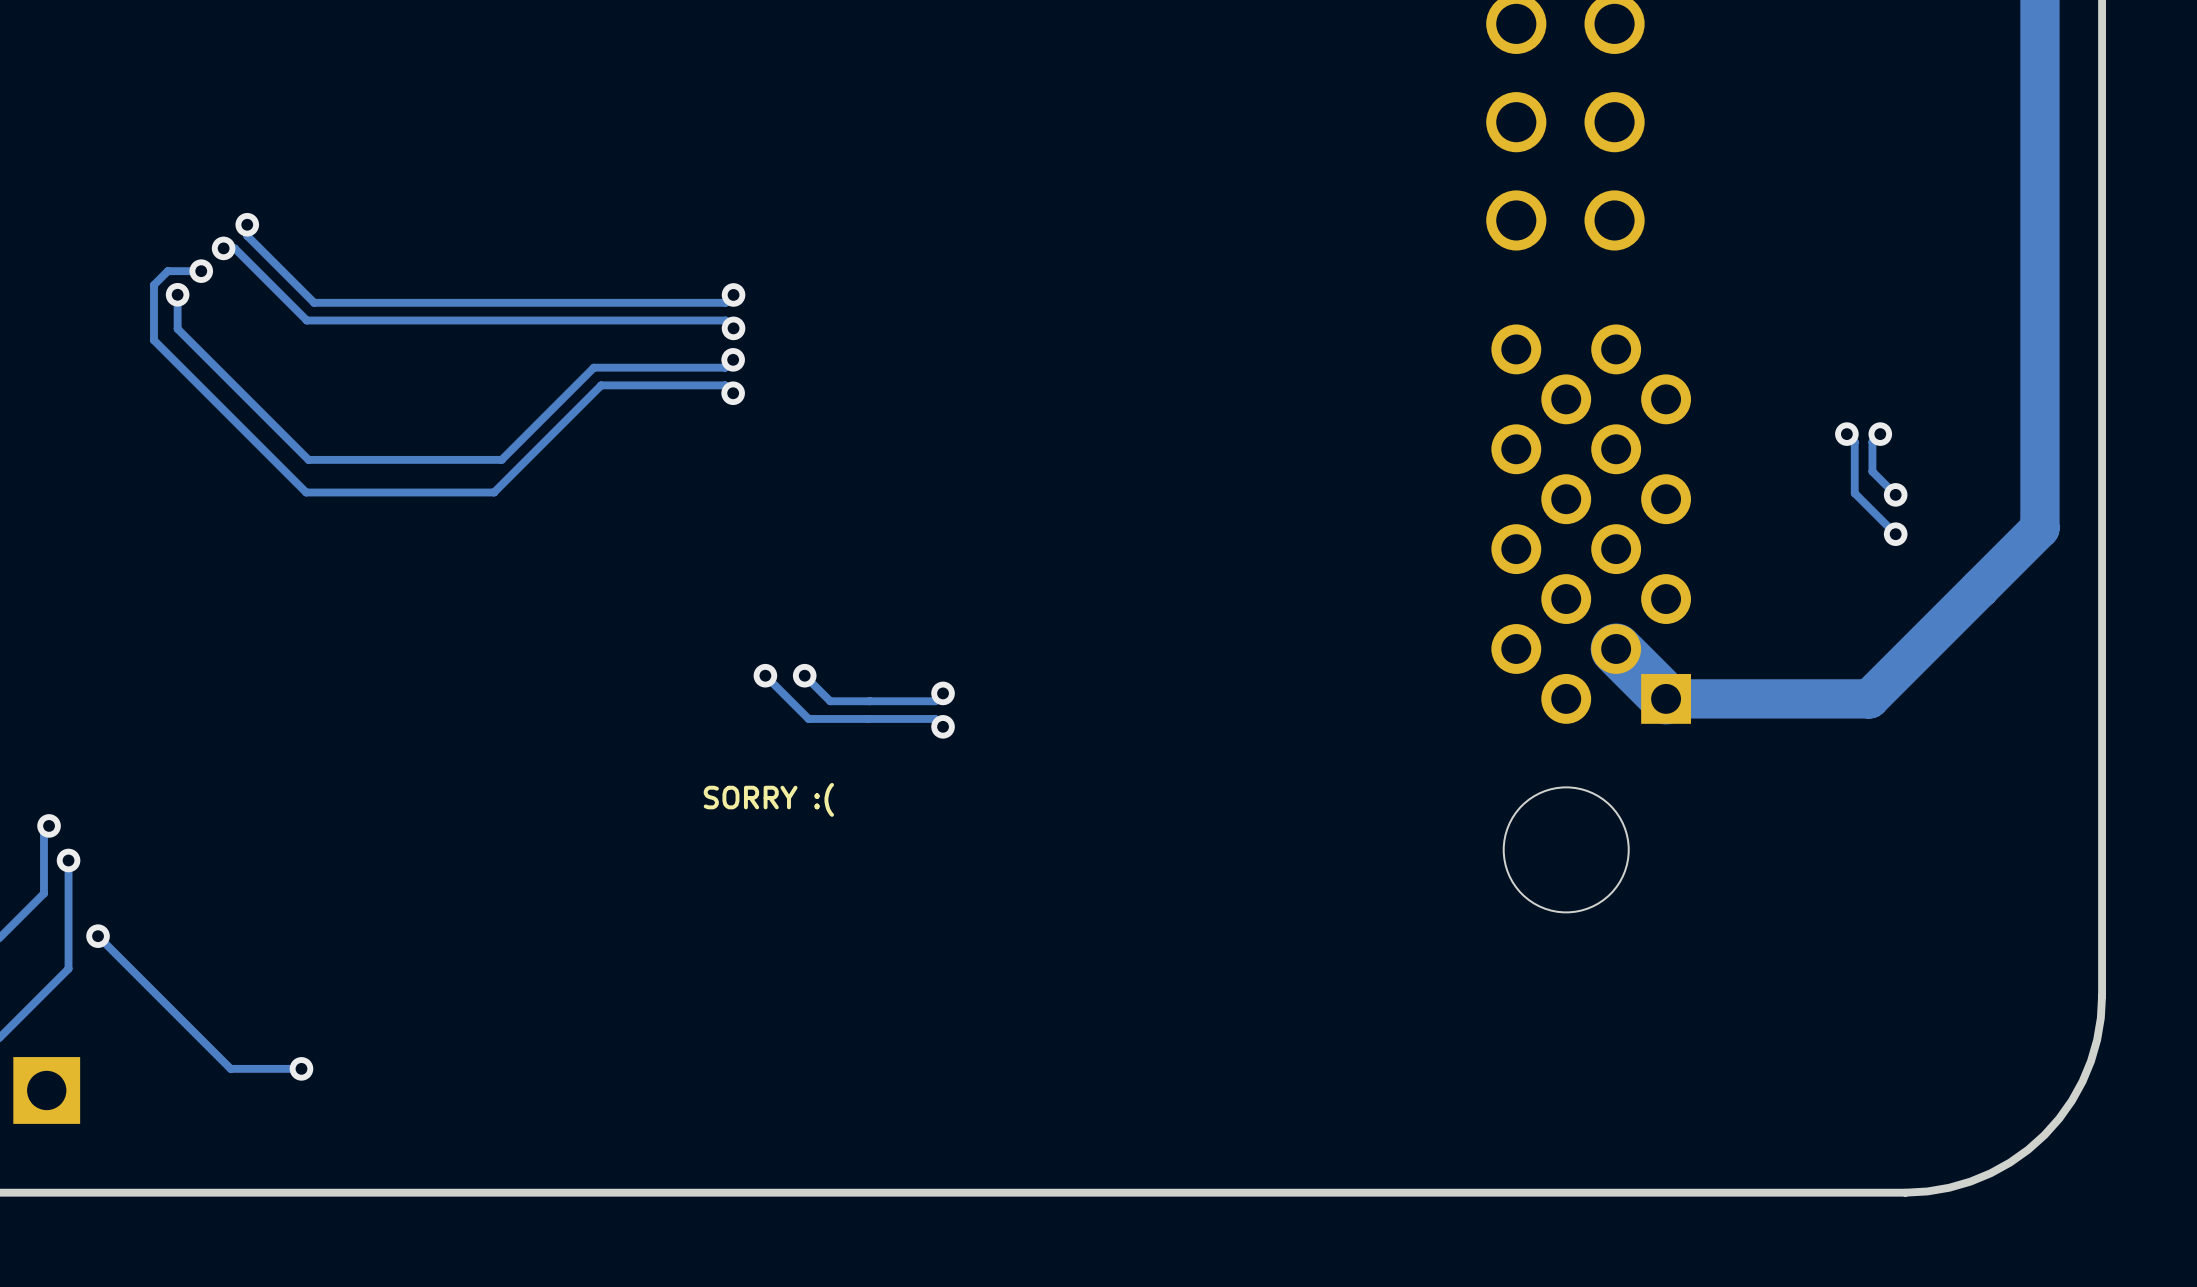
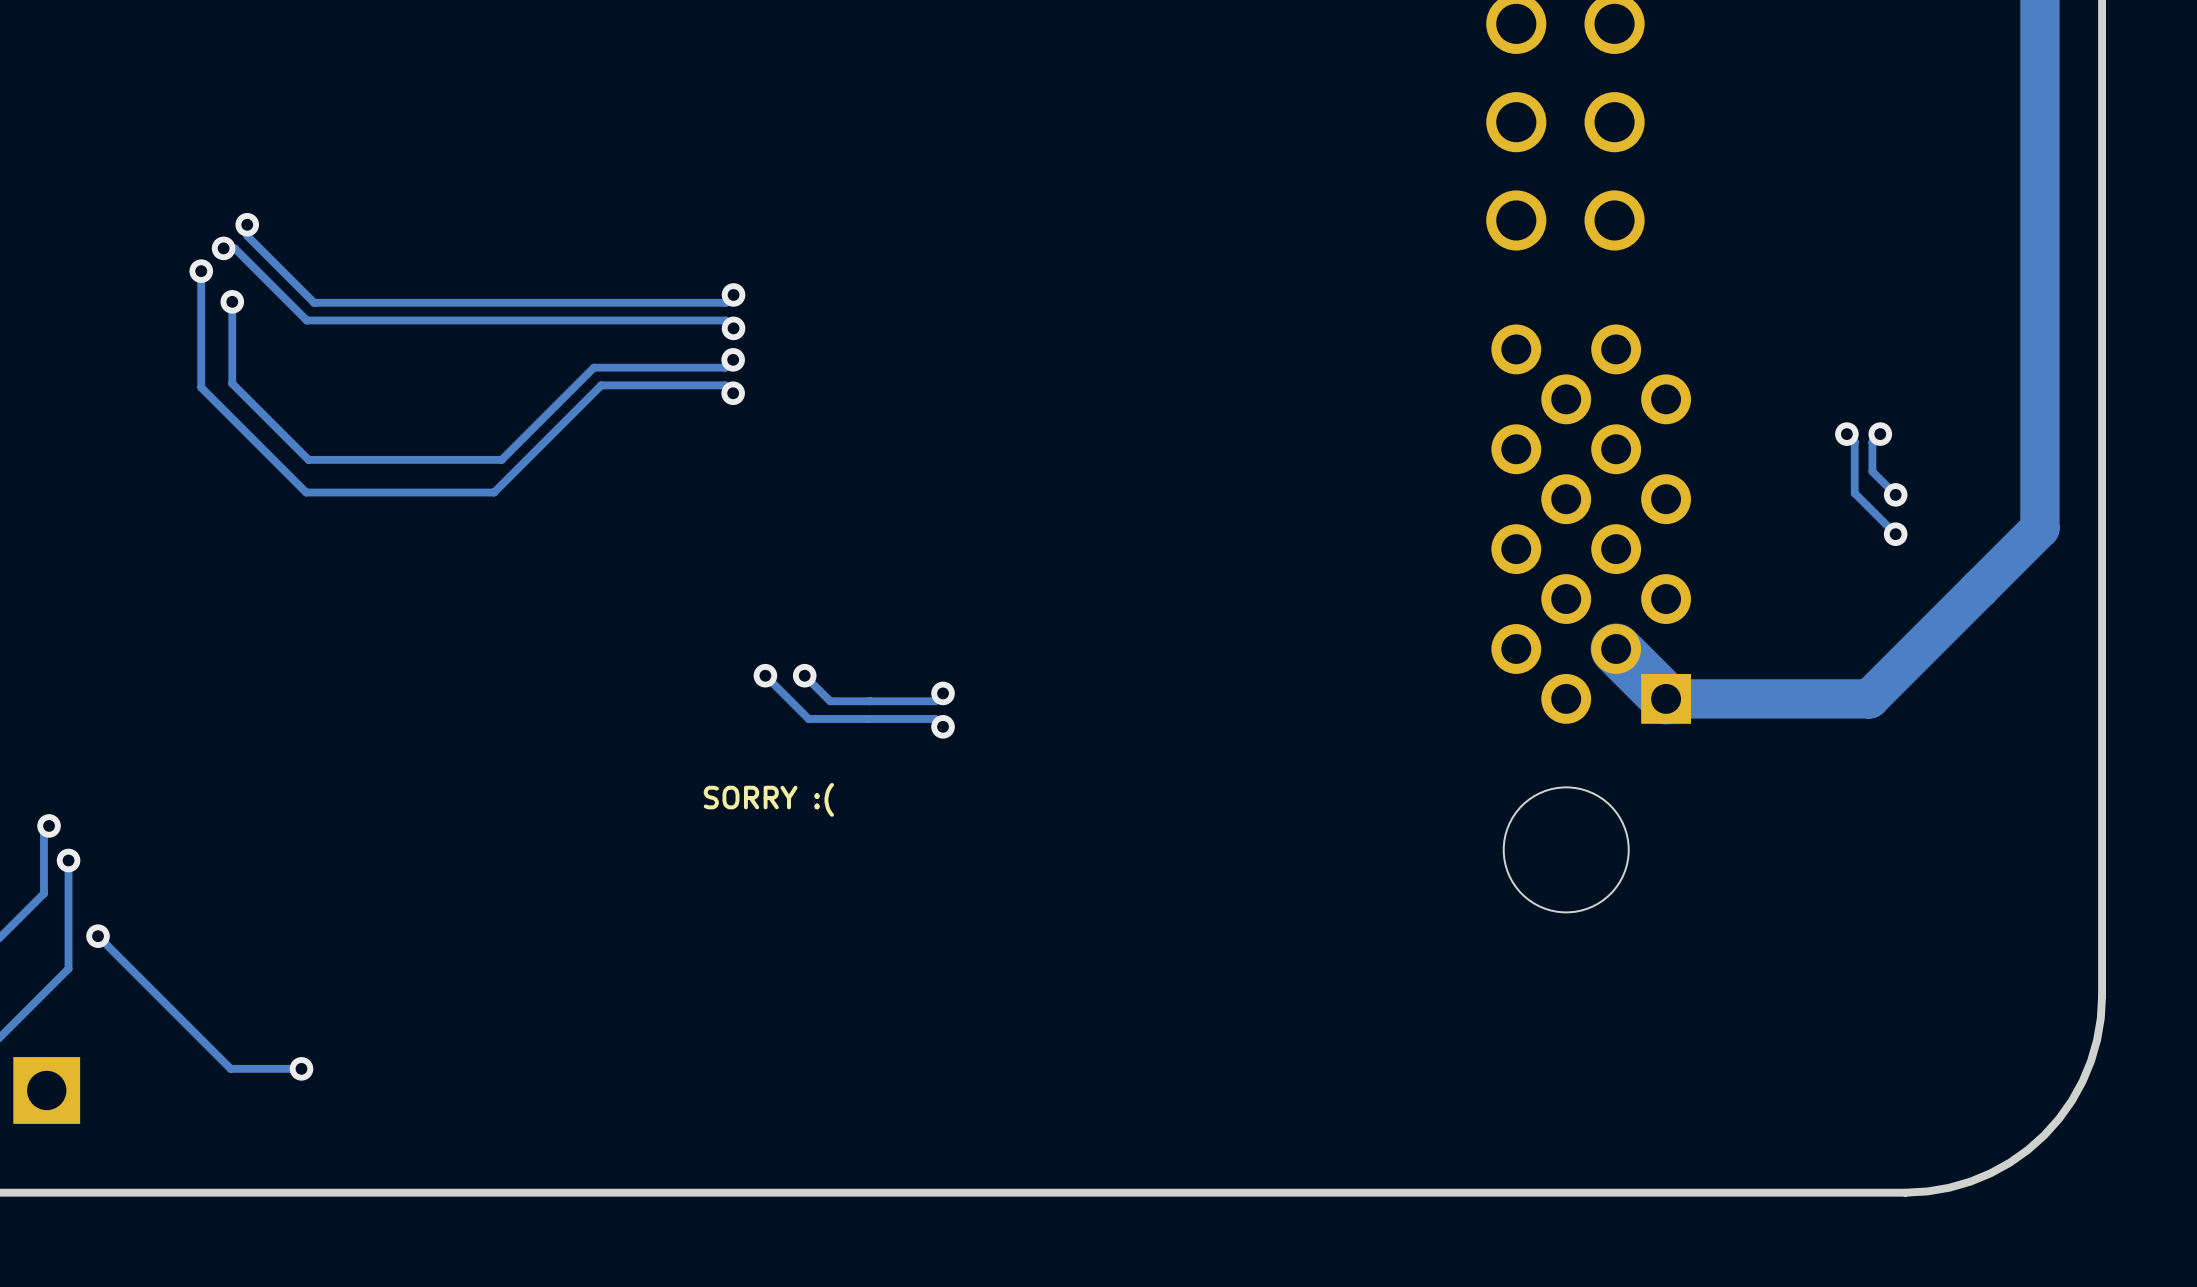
track: (201, 271) (167, 271) (153, 284) (153, 340) (201, 387) -> (201, 271) (201, 387)
track: (177, 294) (177, 328) (232, 383) -> (232, 301) (232, 383)
via position: (177, 294) -> (232, 301)

